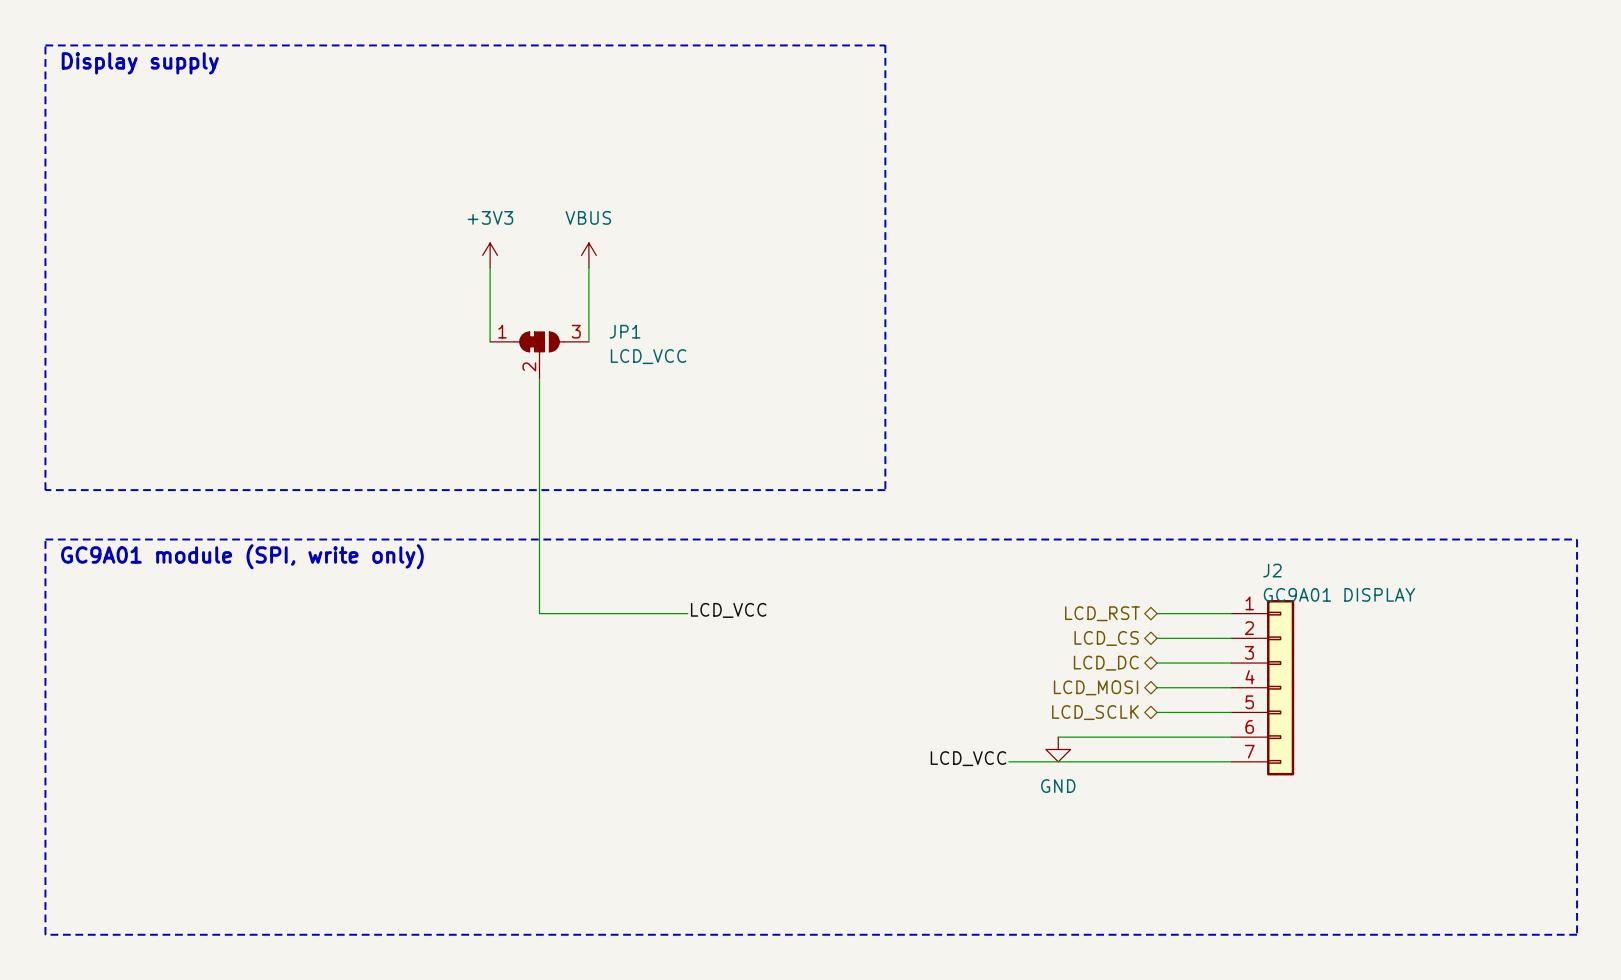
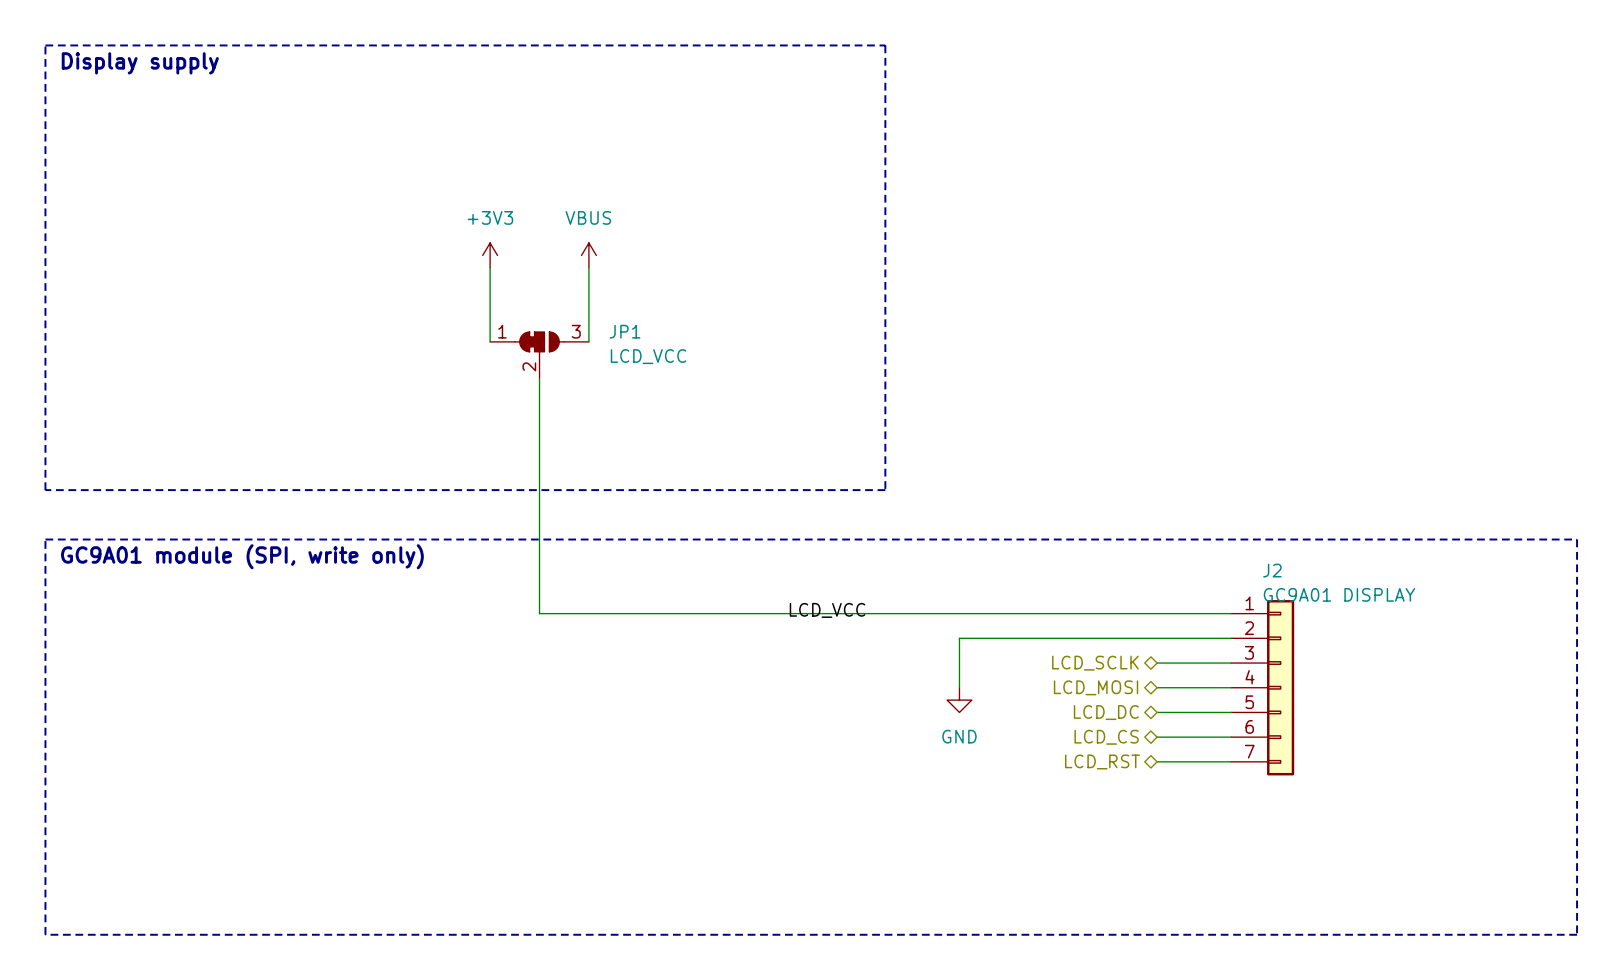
label position: LCD_VCC (728, 610) -> LCD_VCC (827, 610)
wire: none -> (687, 613) (1157, 613)
hierarchical label position: LCD_RST (1102, 613) -> LCD_RST (1102, 761)
hierarchical label position: LCD_CS (1106, 638) -> LCD_CS (1106, 737)
wire: none -> (1157, 638) (959, 638) (959, 687)
hierarchical label: LCD_DC (1106, 663) -> LCD_SCLK (1095, 663)
hierarchical label: LCD_SCLK (1095, 712) -> LCD_DC (1106, 712)
wire: (1058, 737) (1157, 737) -> none
power symbol position: GND (1058, 749) -> GND (959, 700)
label: LCD_VCC (968, 758) -> none
wire: (1008, 761) (1157, 761) -> none

